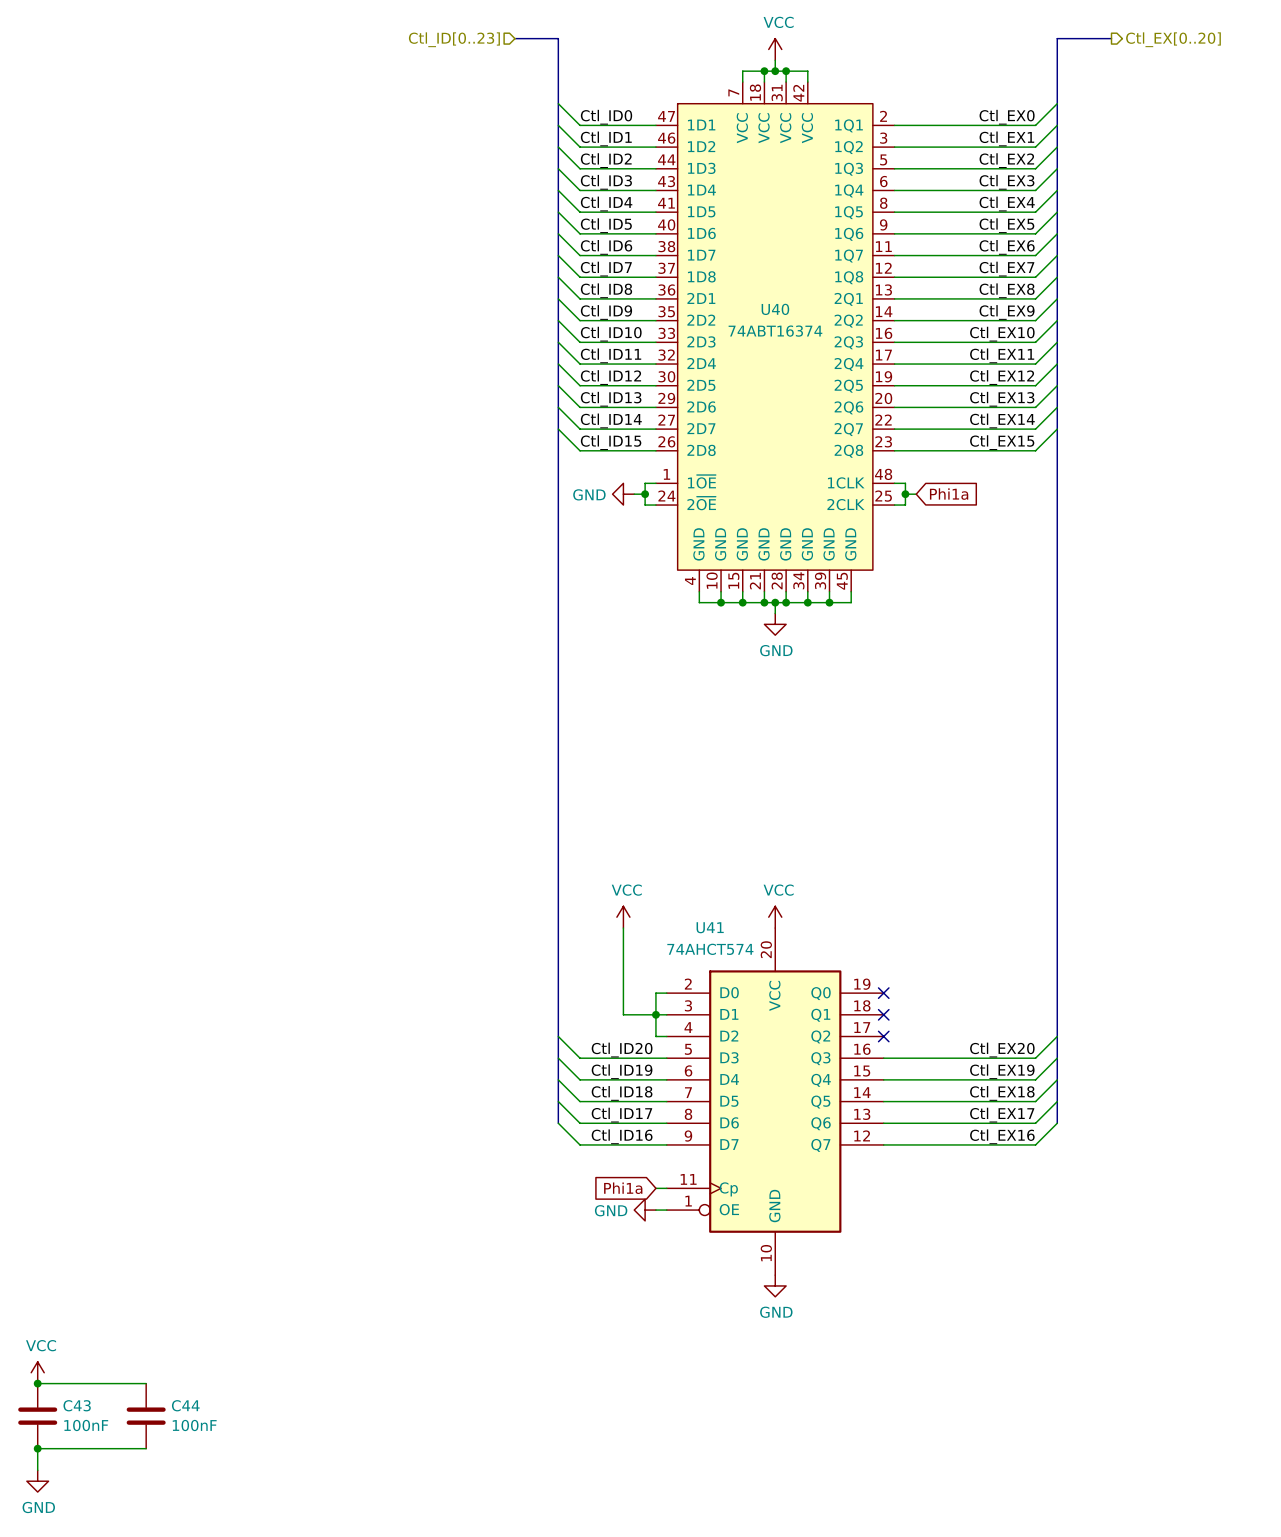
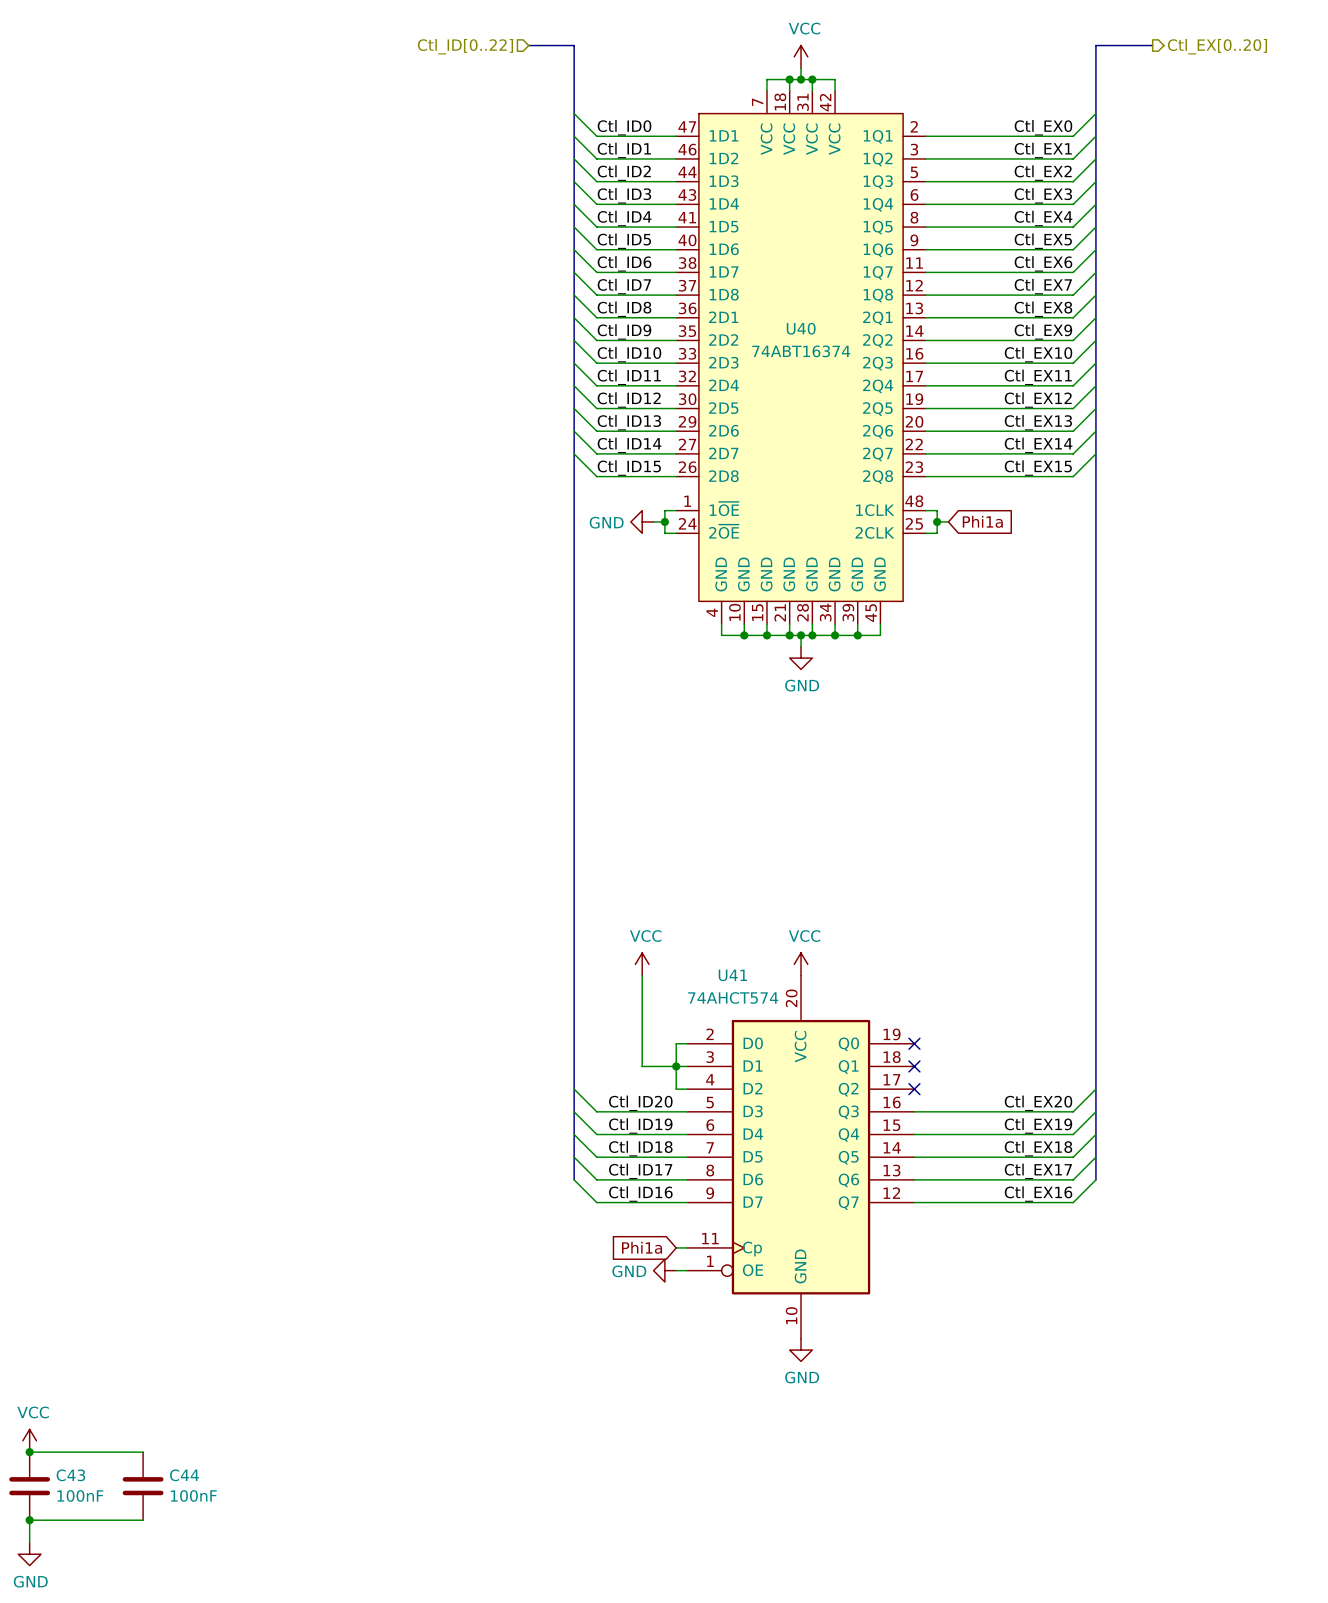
hierarchical label: Ctl_ID[0..23] (454, 39) -> Ctl_ID[0..22] (465, 46)

